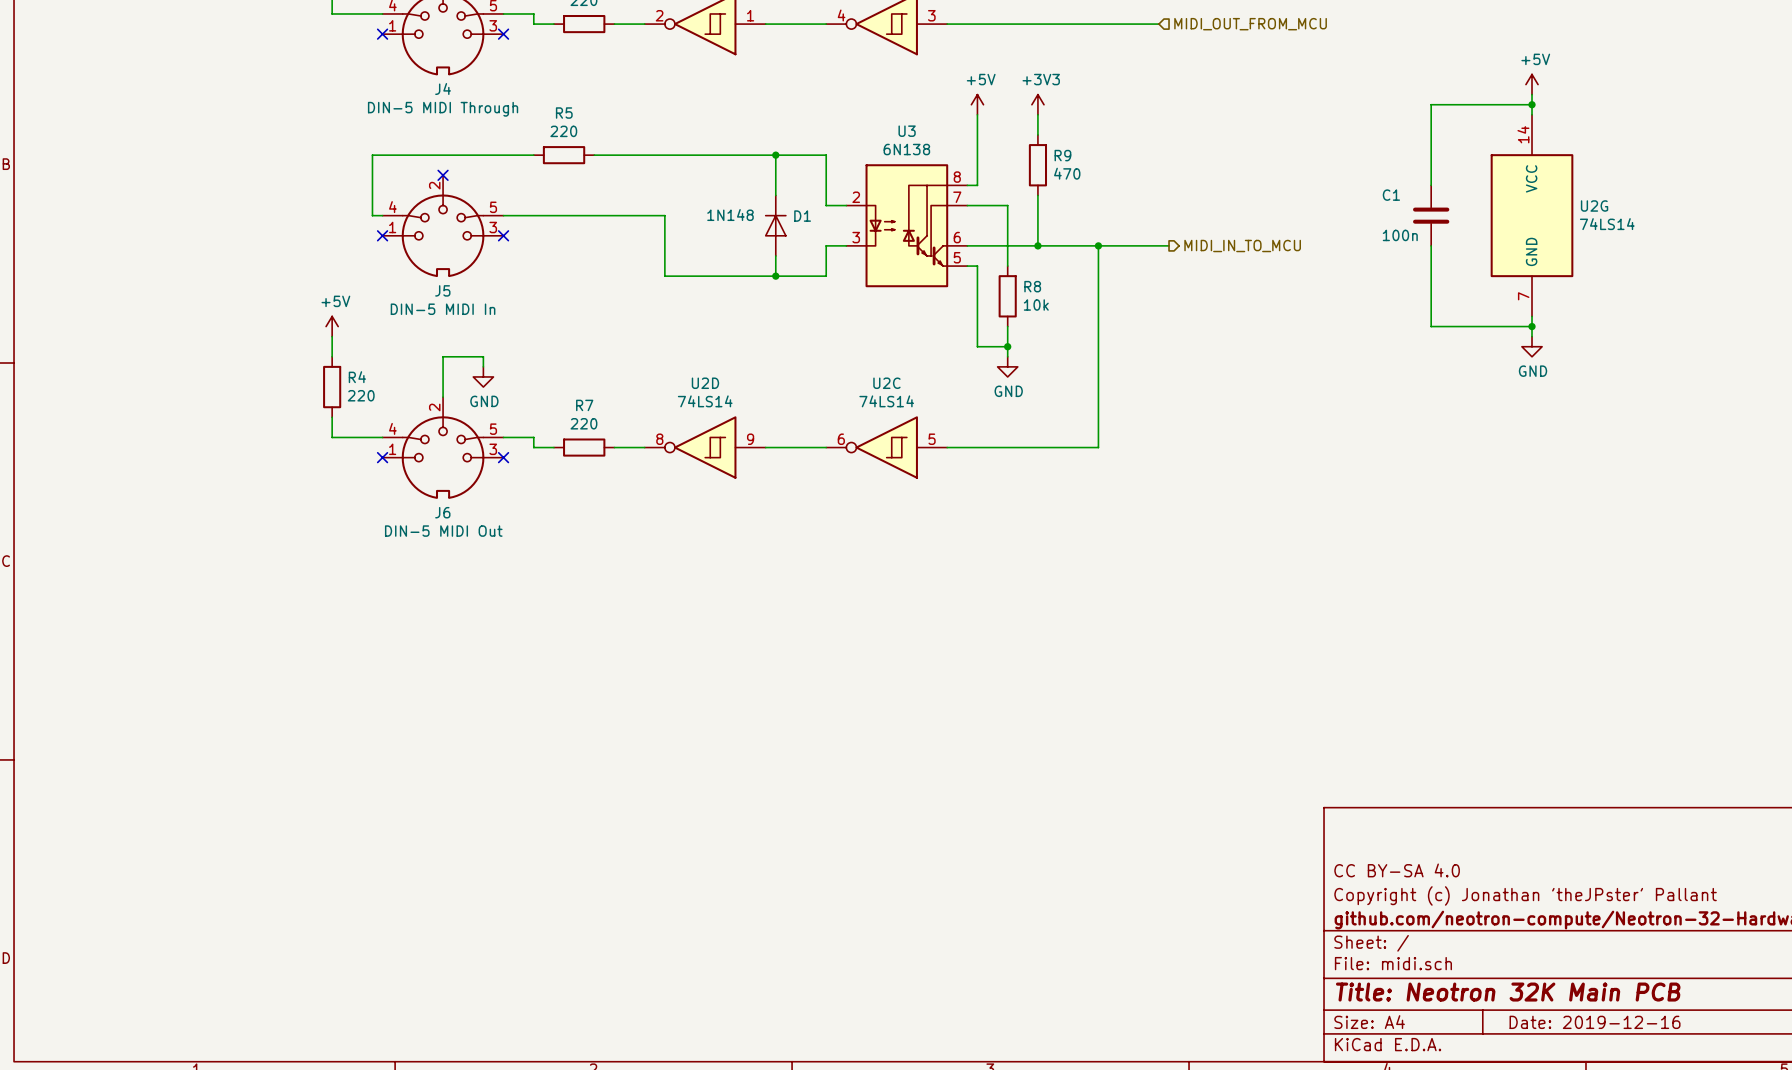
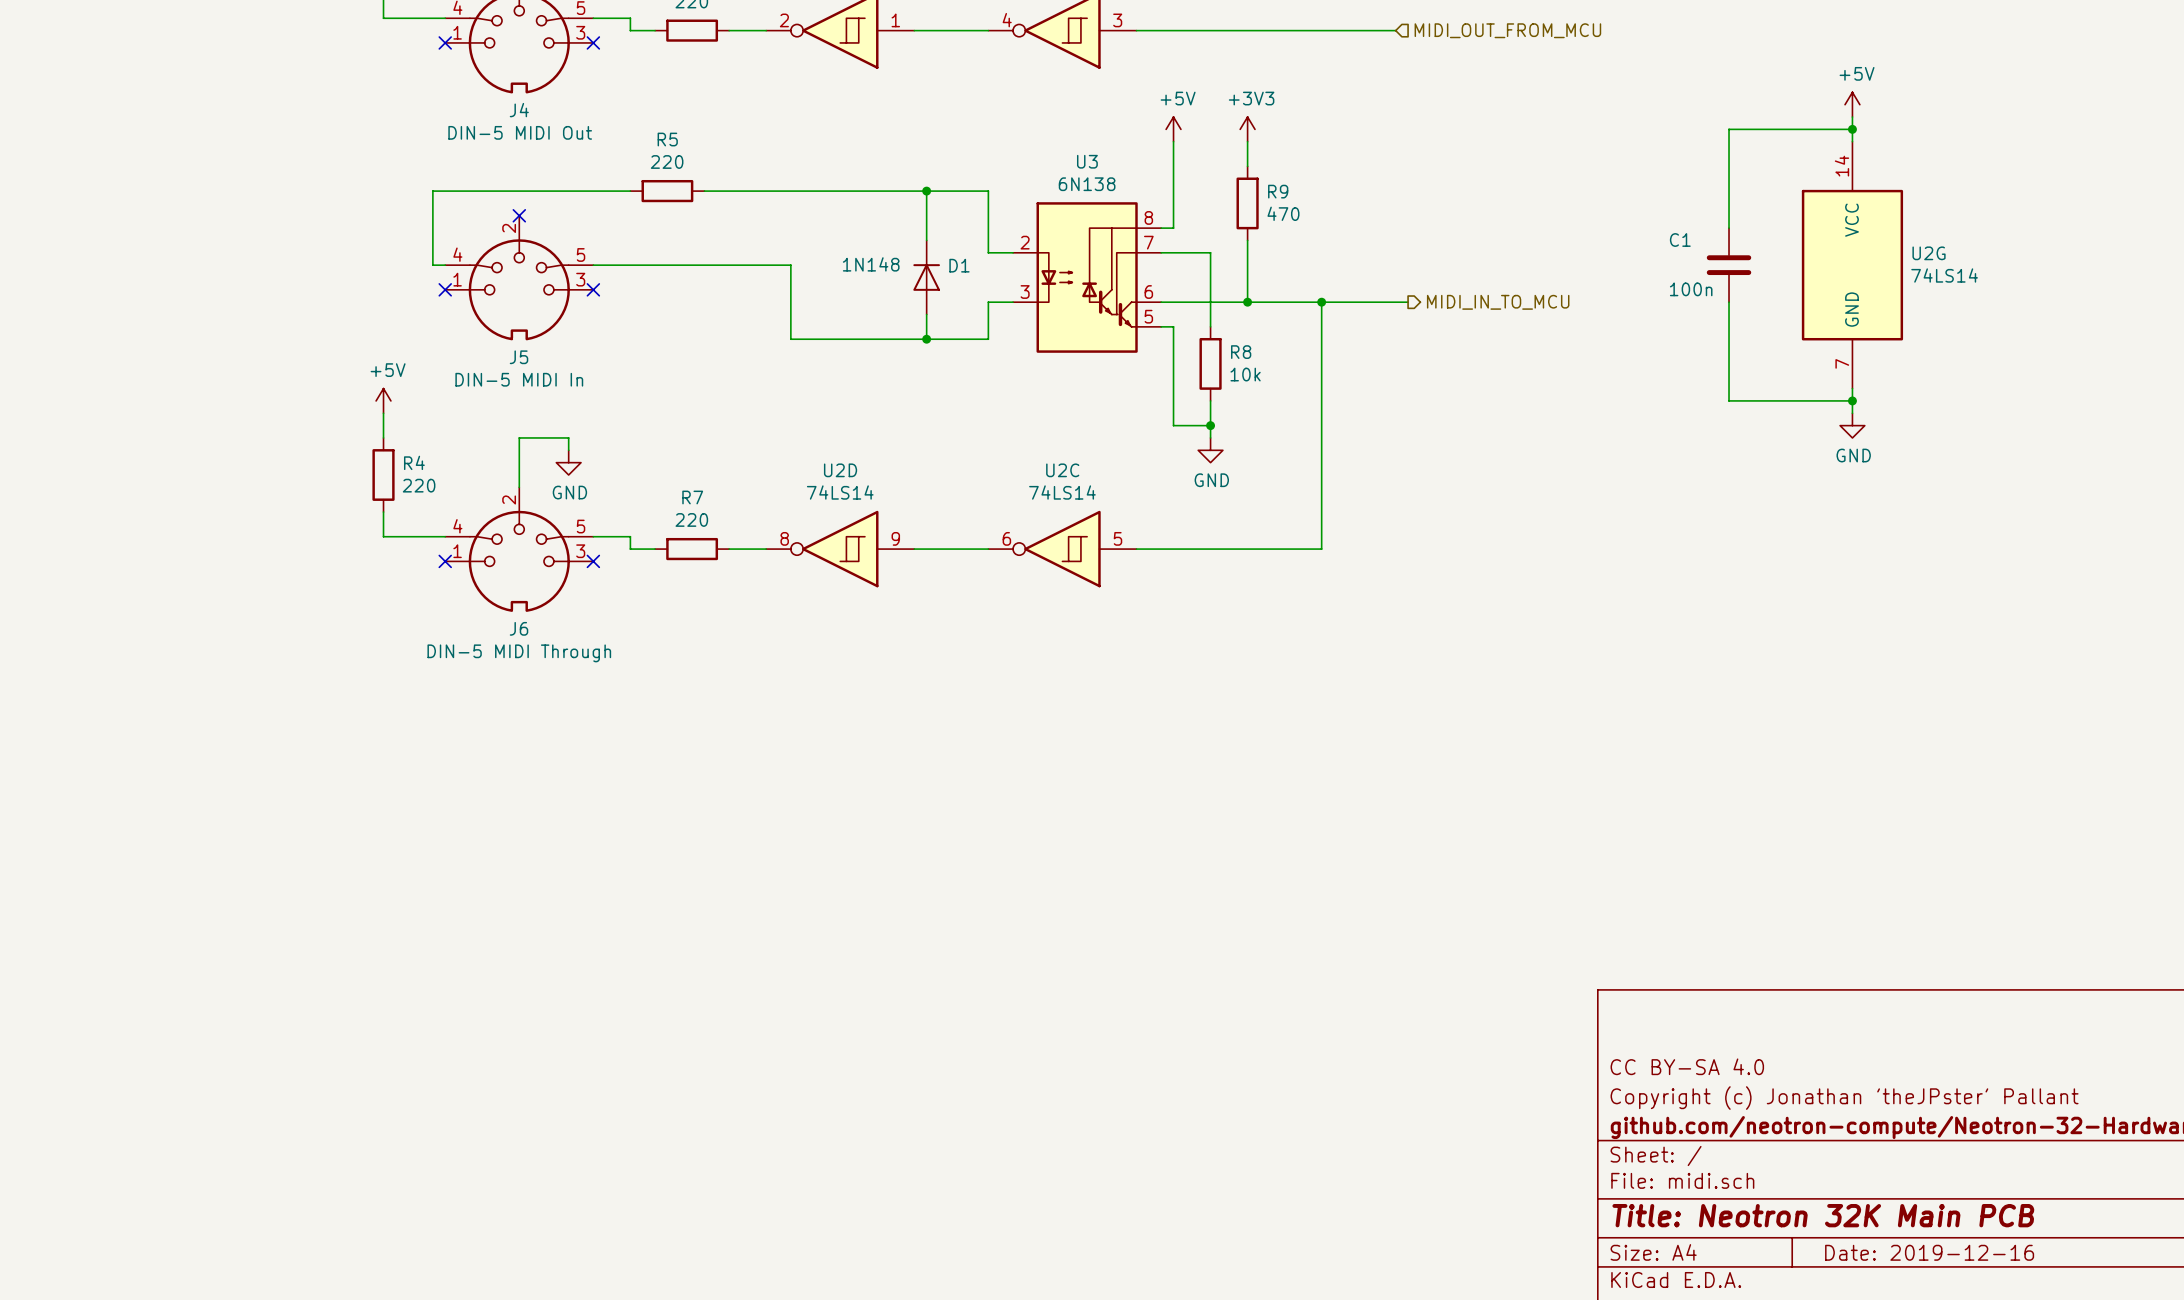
J4 value: DIN-5 MIDI Through (443, 109) -> DIN-5 MIDI Out (520, 132)
J6 value: DIN-5 MIDI Out (443, 531) -> DIN-5 MIDI Through (519, 653)

